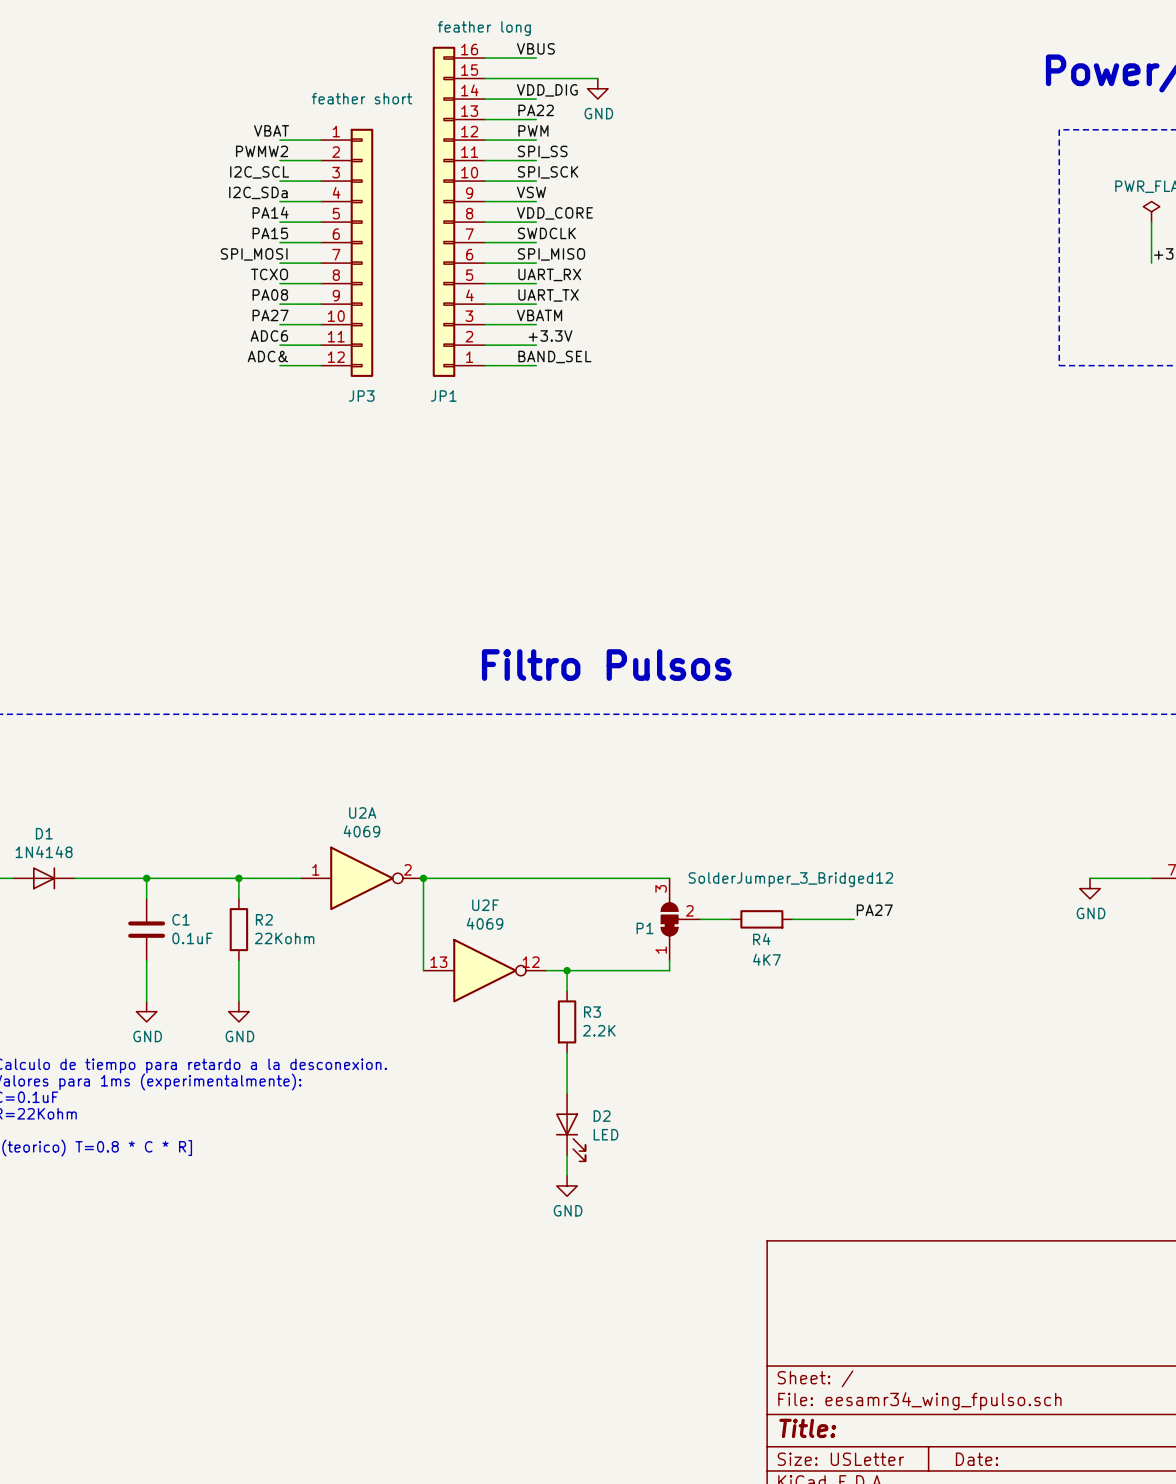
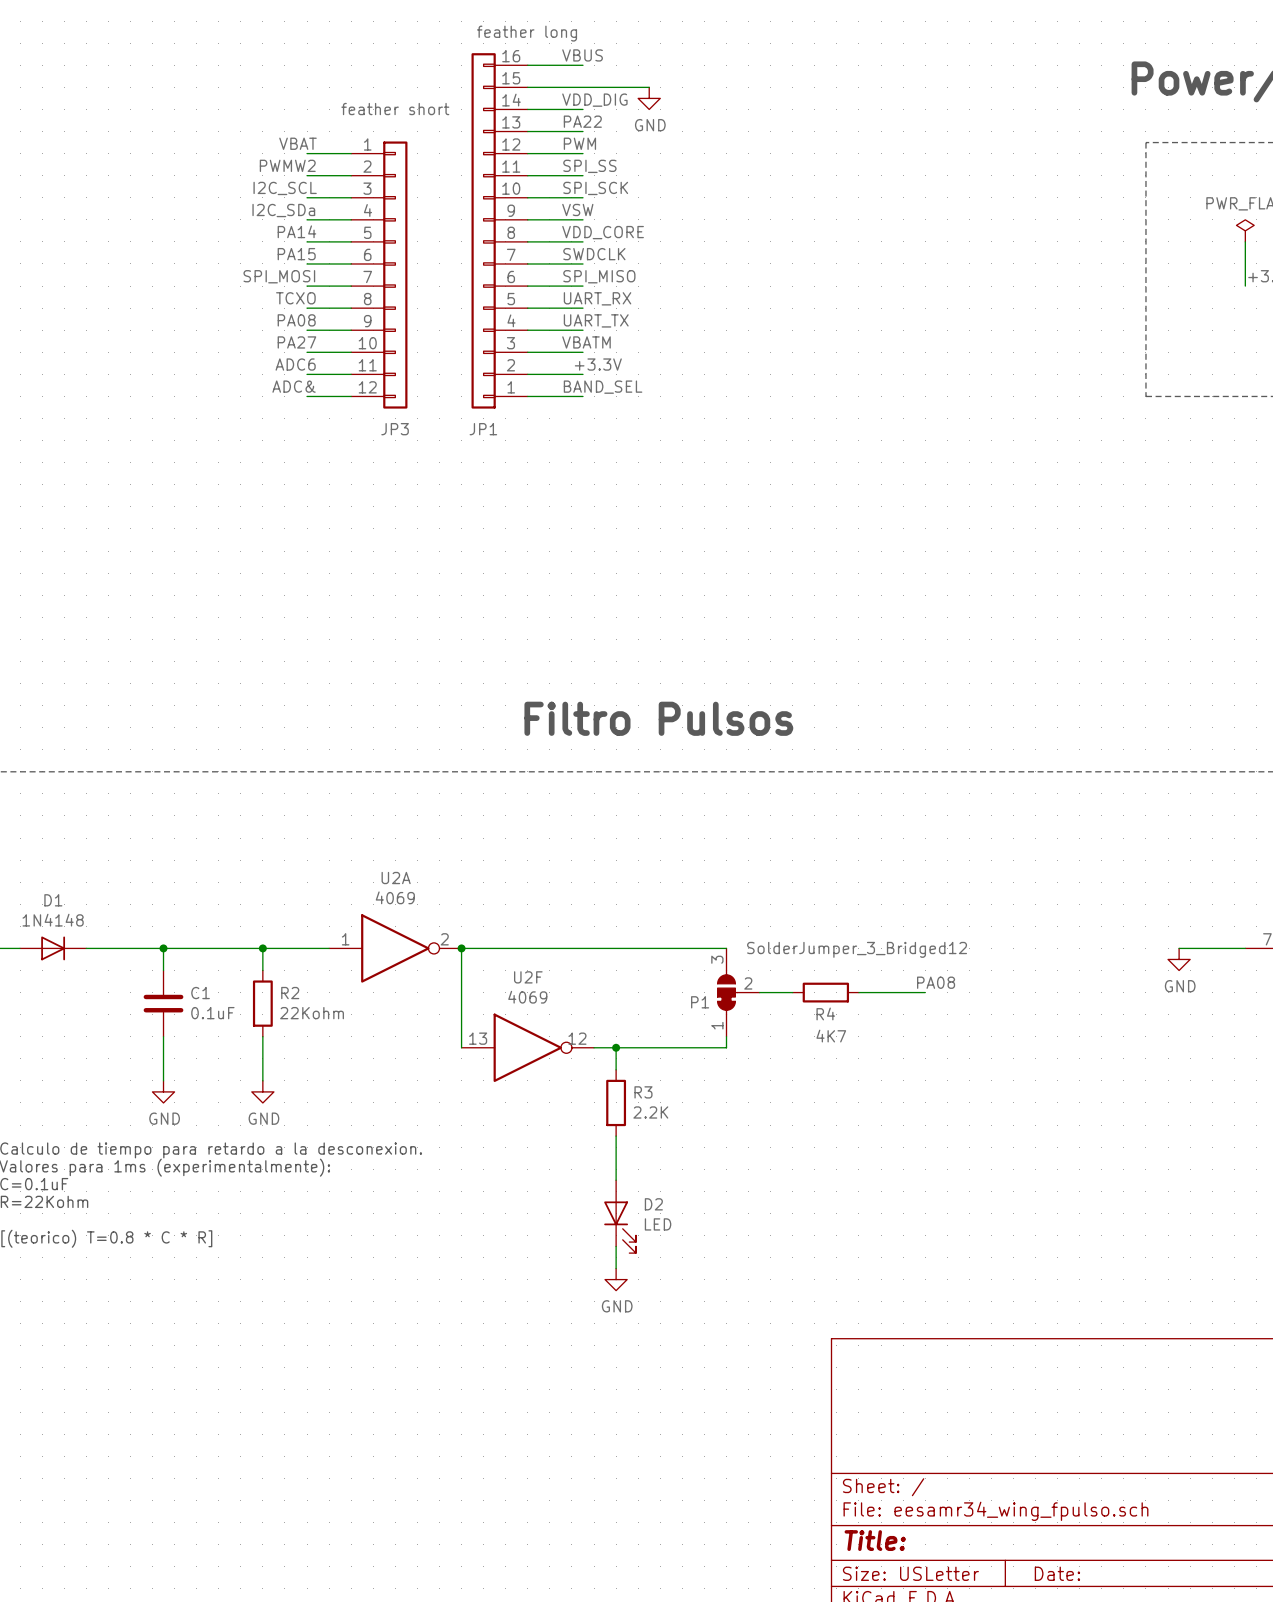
label: none -> PA08 (936, 982)
label: PA27 (874, 910) -> none

